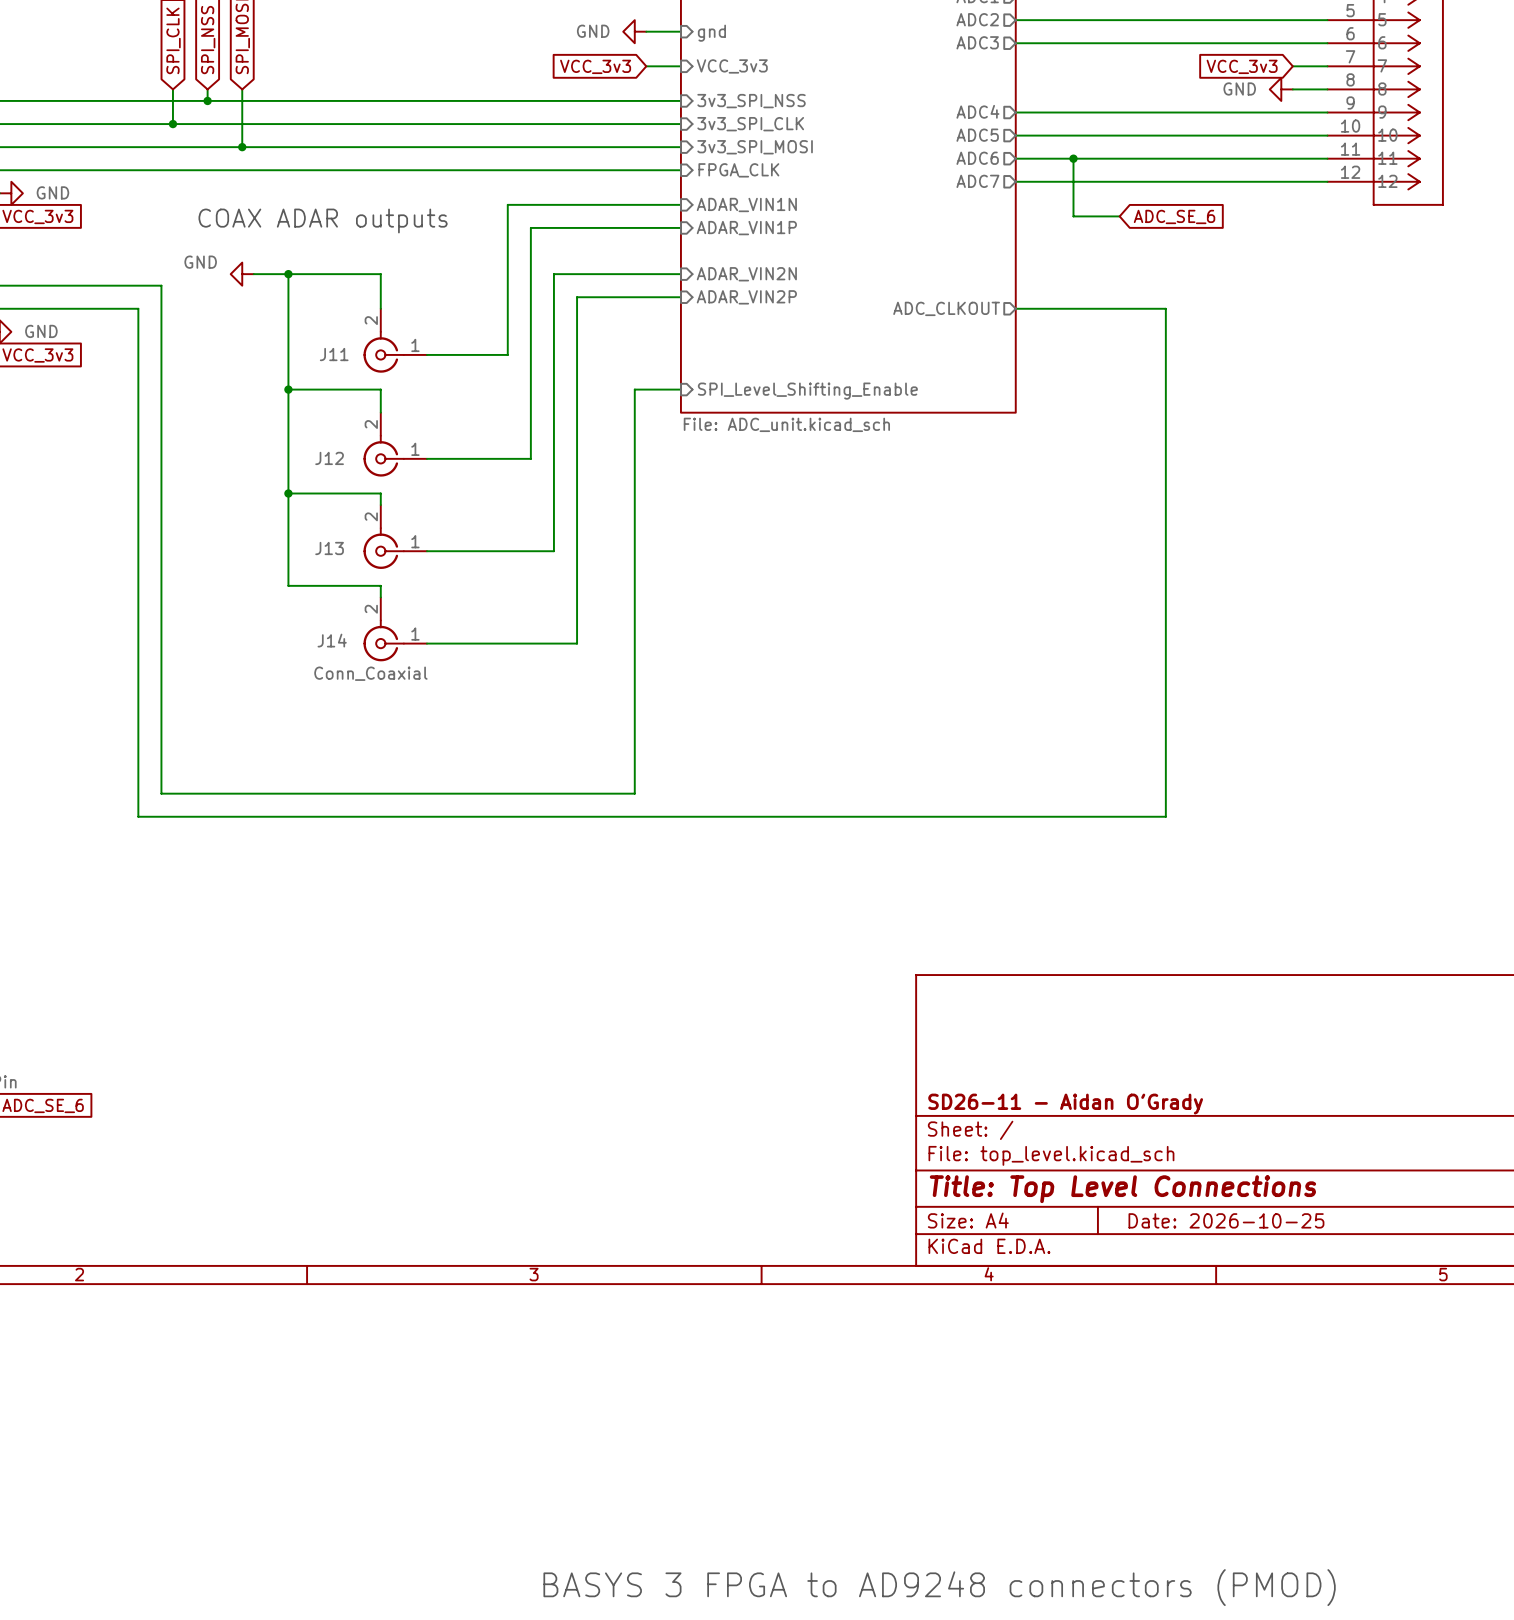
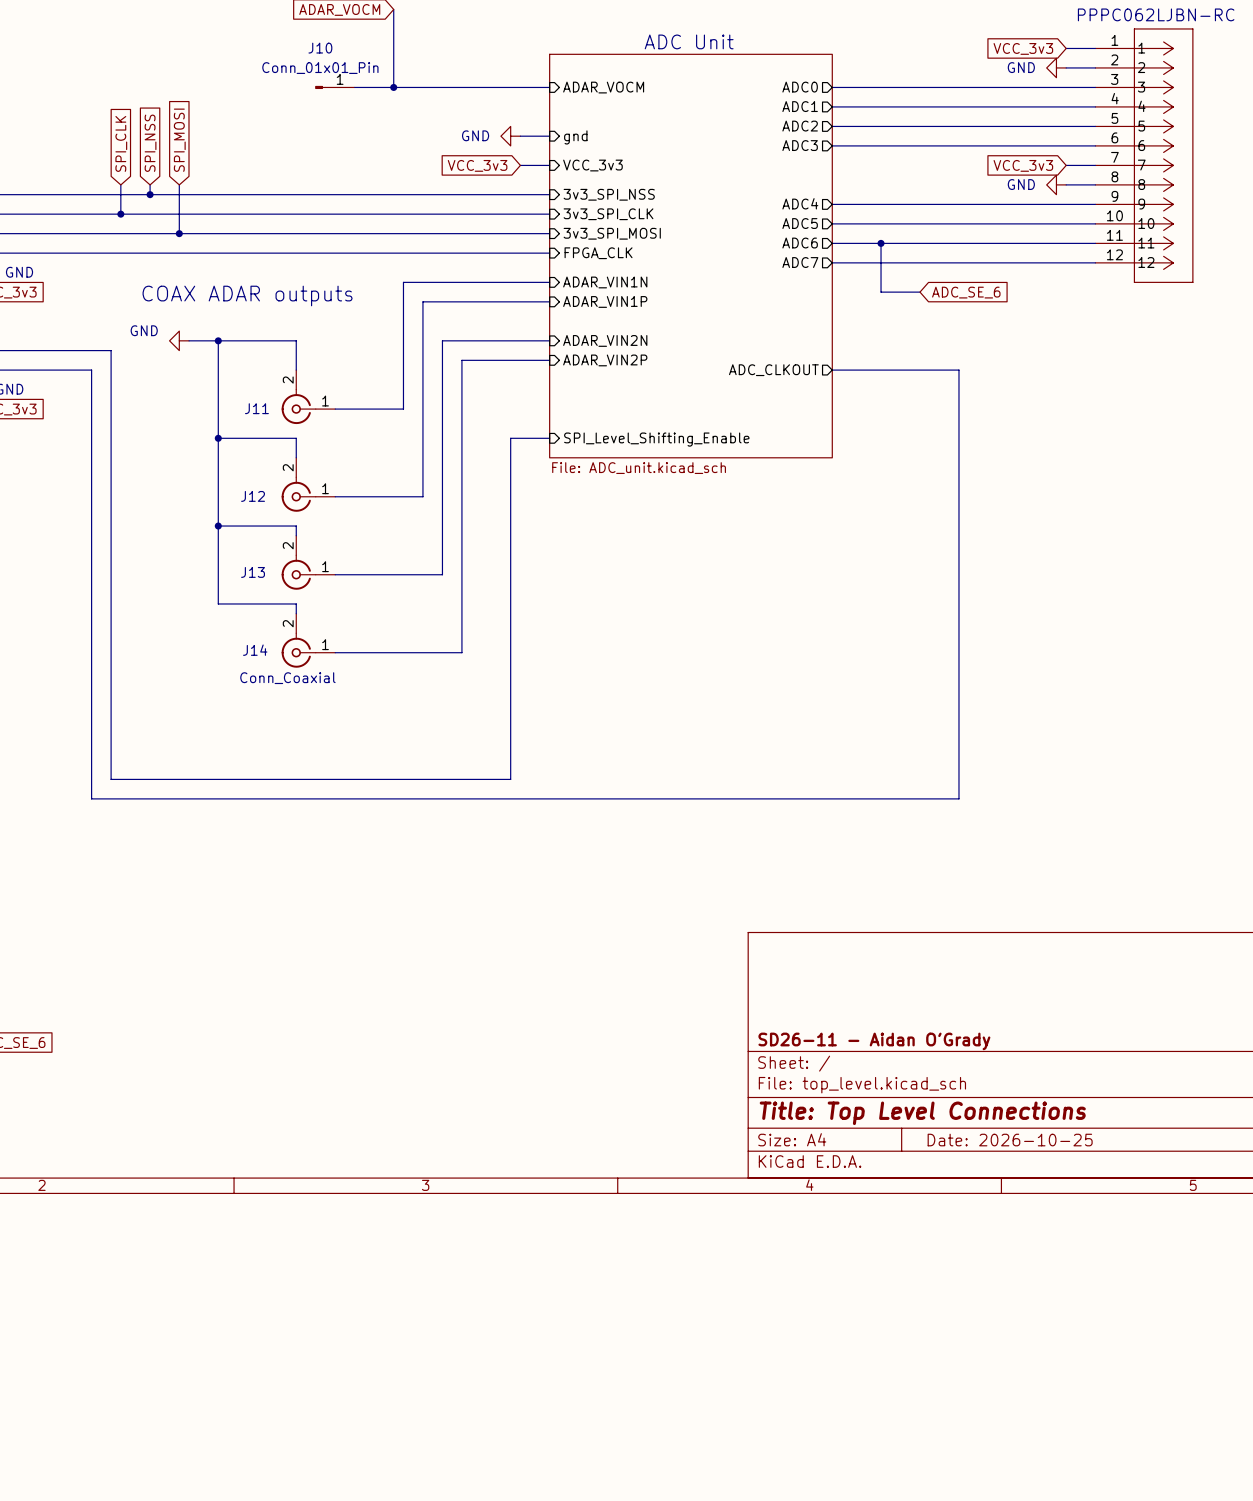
text: BASYS 3 FPGA to AD9248 connectors (PMOD) (939, 1587) -> none

